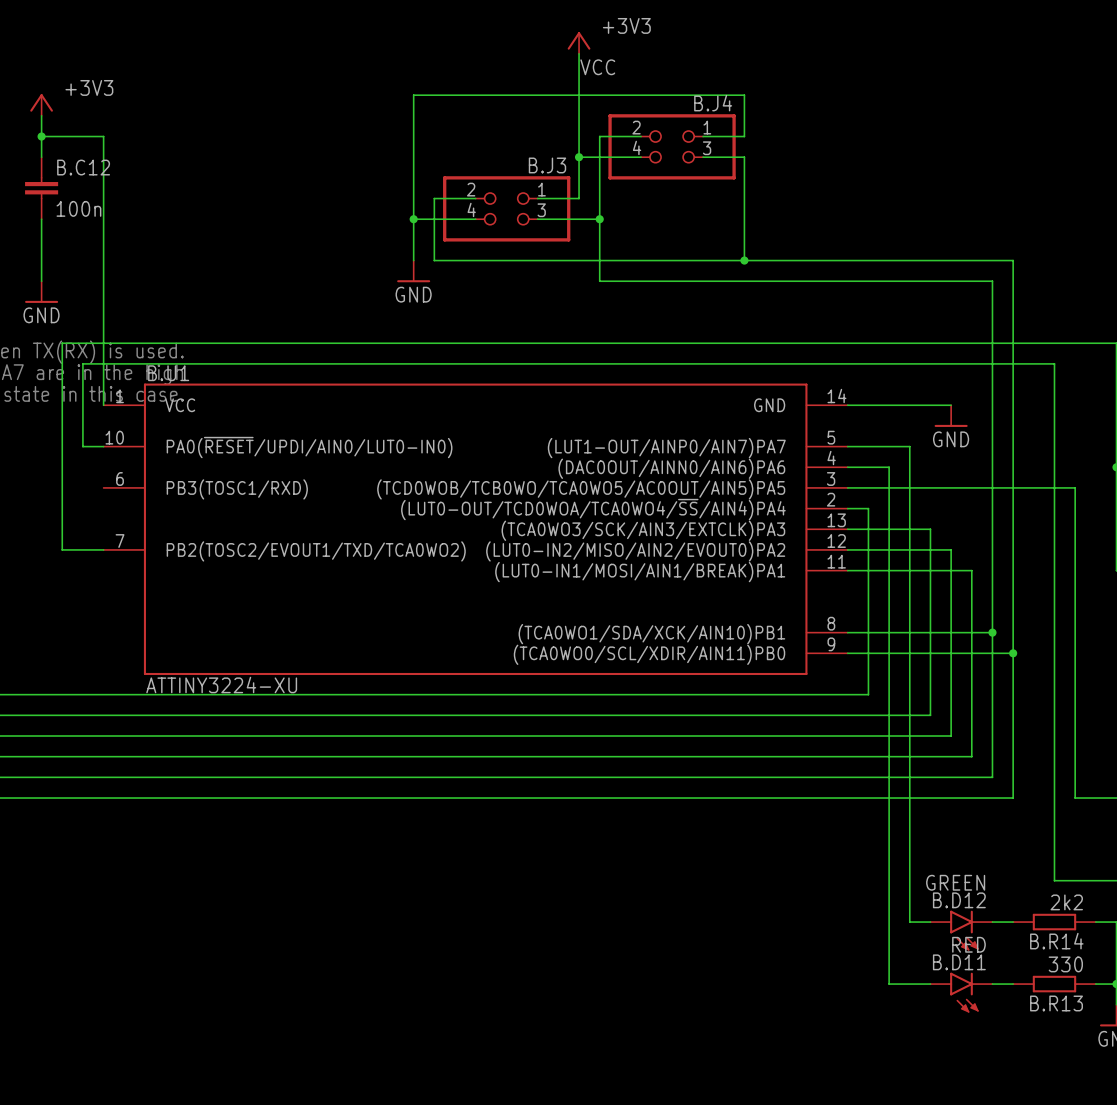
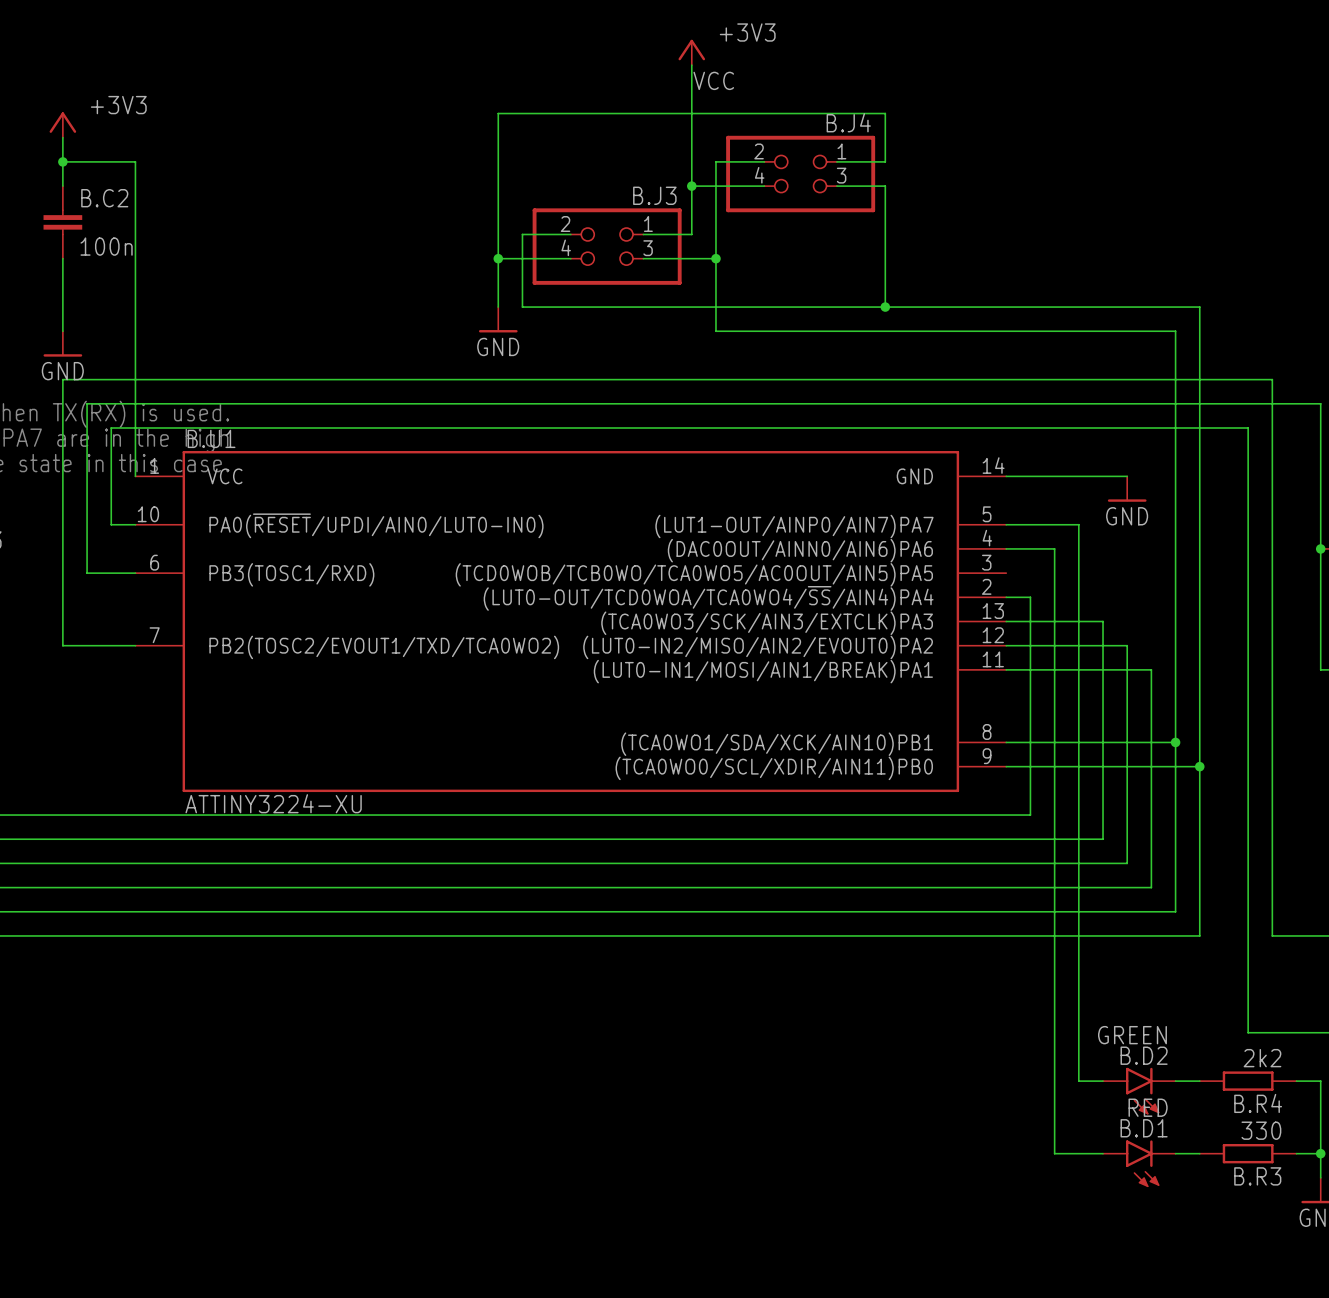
B.C12 name: B.C12 (83, 167) -> B.C2 (104, 198)
wire: (62, 487) (62, 549) -> (87, 573) (135, 573)
wire: (847, 487) (1075, 487) -> (87, 645) (62, 645) (62, 379) (1272, 379) (1272, 573)
B.D12 name: B.D12 (959, 900) -> B.D2 (1144, 1055)
B.R14 name: B.R14 (1056, 941) -> B.R4 (1258, 1103)
B.D11 name: B.D11 (959, 962) -> B.D1 (1144, 1128)
B.R13 name: B.R13 (1056, 1003) -> B.R3 (1257, 1176)

